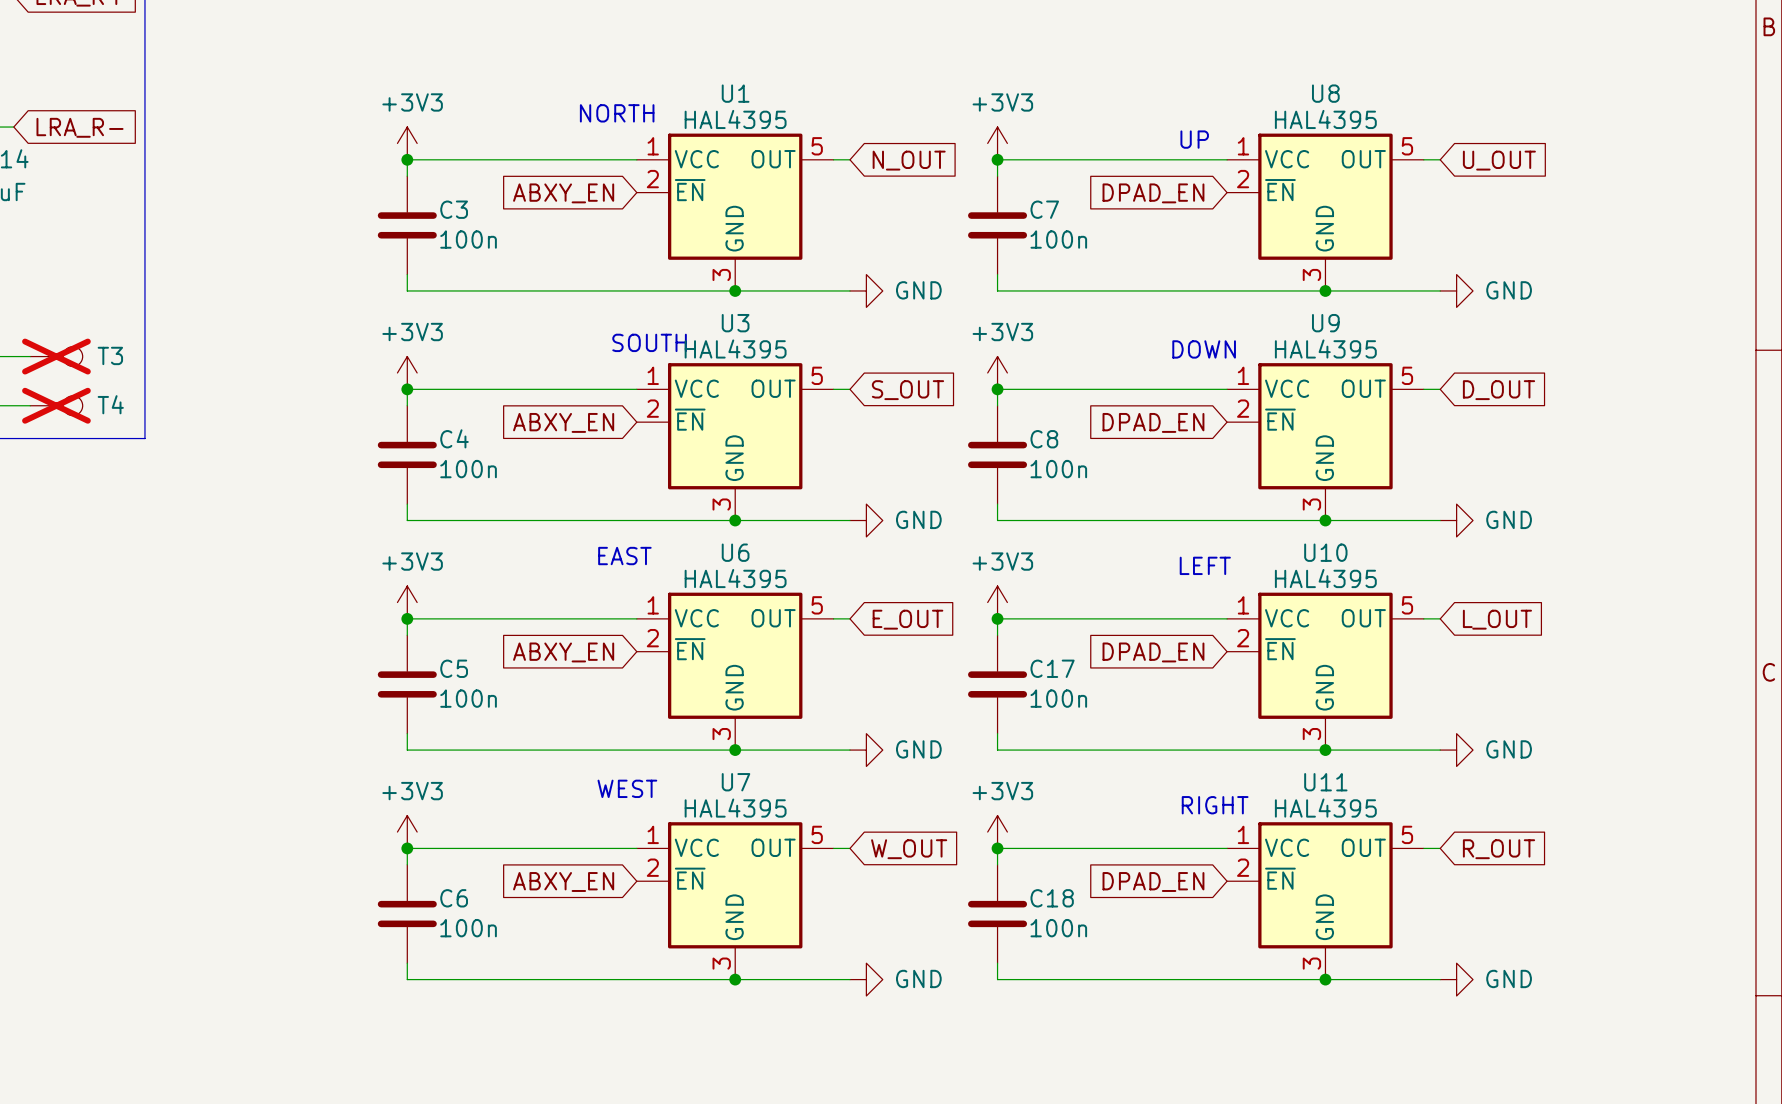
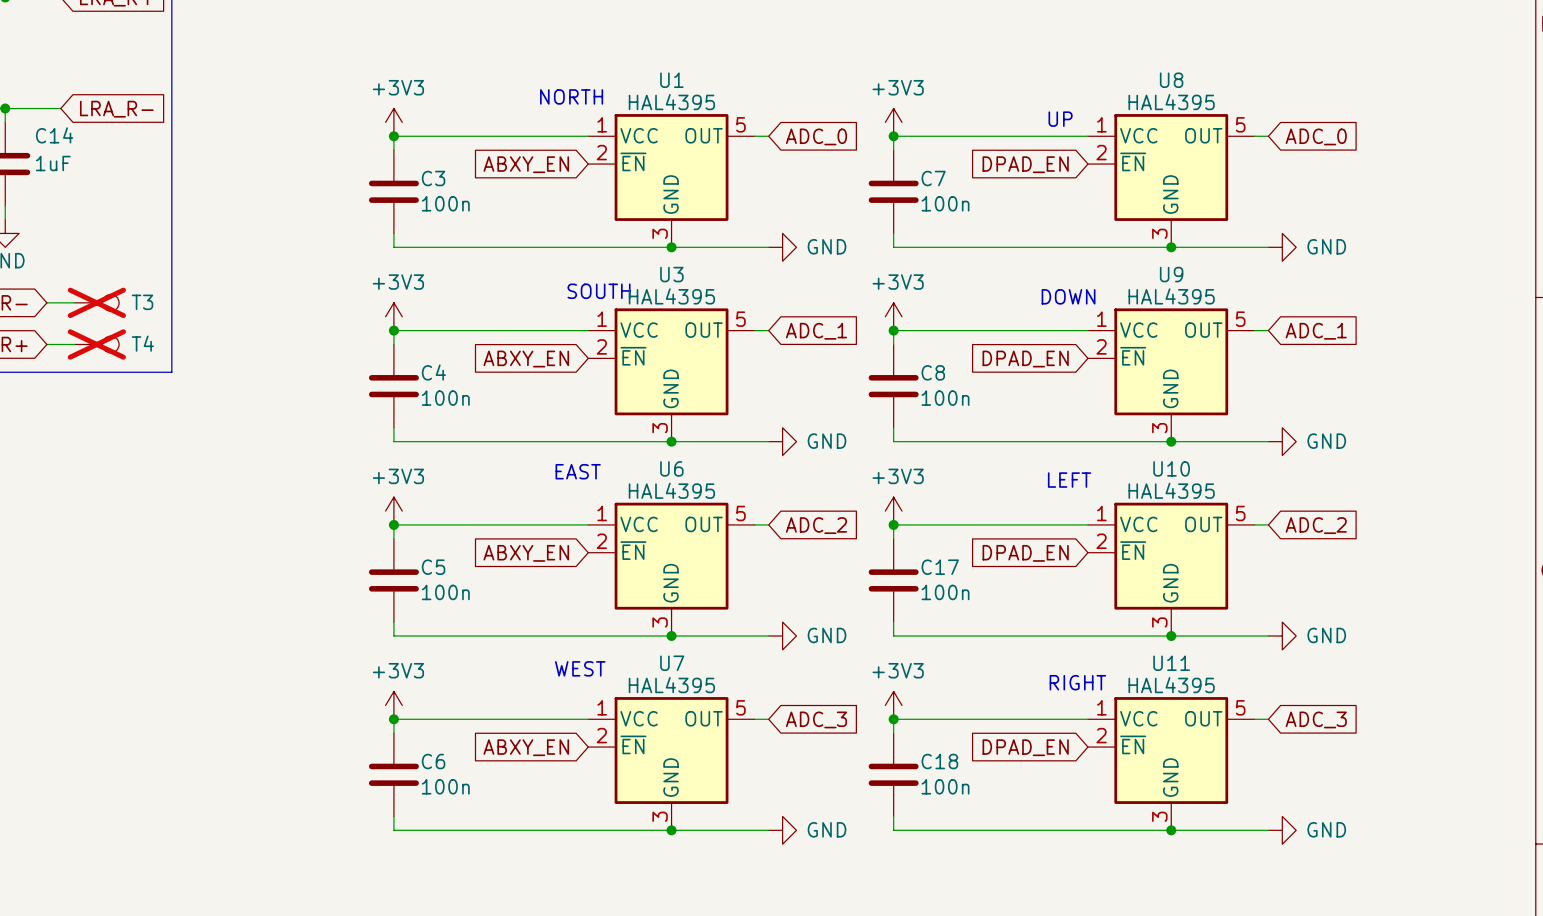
global label: N_OUT (909, 160) -> ADC_0 (816, 136)
global label: U_OUT (1499, 160) -> ADC_0 (1316, 136)
global label: S_OUT (907, 390) -> ADC_1 (816, 331)
global label: D_OUT (1499, 390) -> ADC_1 (1316, 331)
global label: E_OUT (907, 619) -> ADC_2 (816, 525)
global label: L_OUT (1497, 619) -> ADC_2 (1316, 525)
global label: W_OUT (909, 849) -> ADC_3 (816, 719)
global label: R_OUT (1499, 849) -> ADC_3 (1316, 719)

